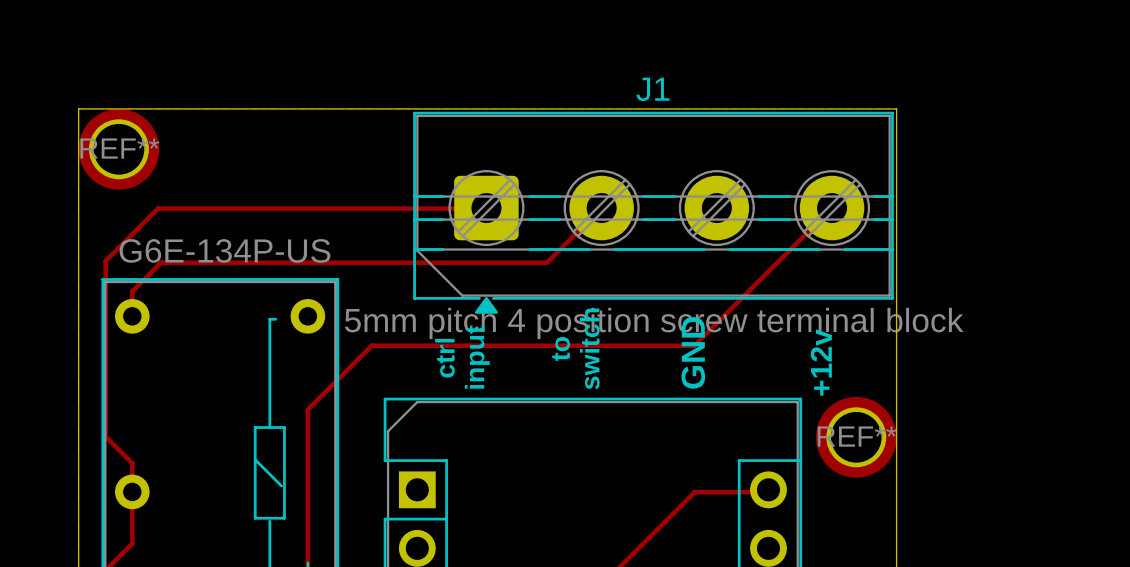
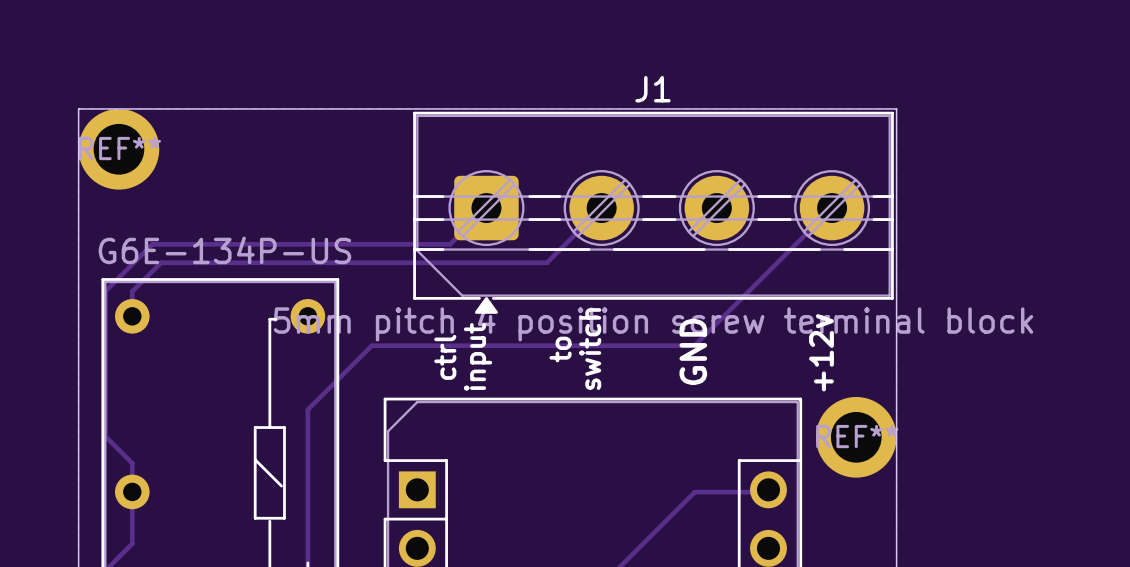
track: (485, 208) (158, 208) (105, 261) (105, 290) -> (485, 208) (450, 244) (152, 244) (105, 290)

